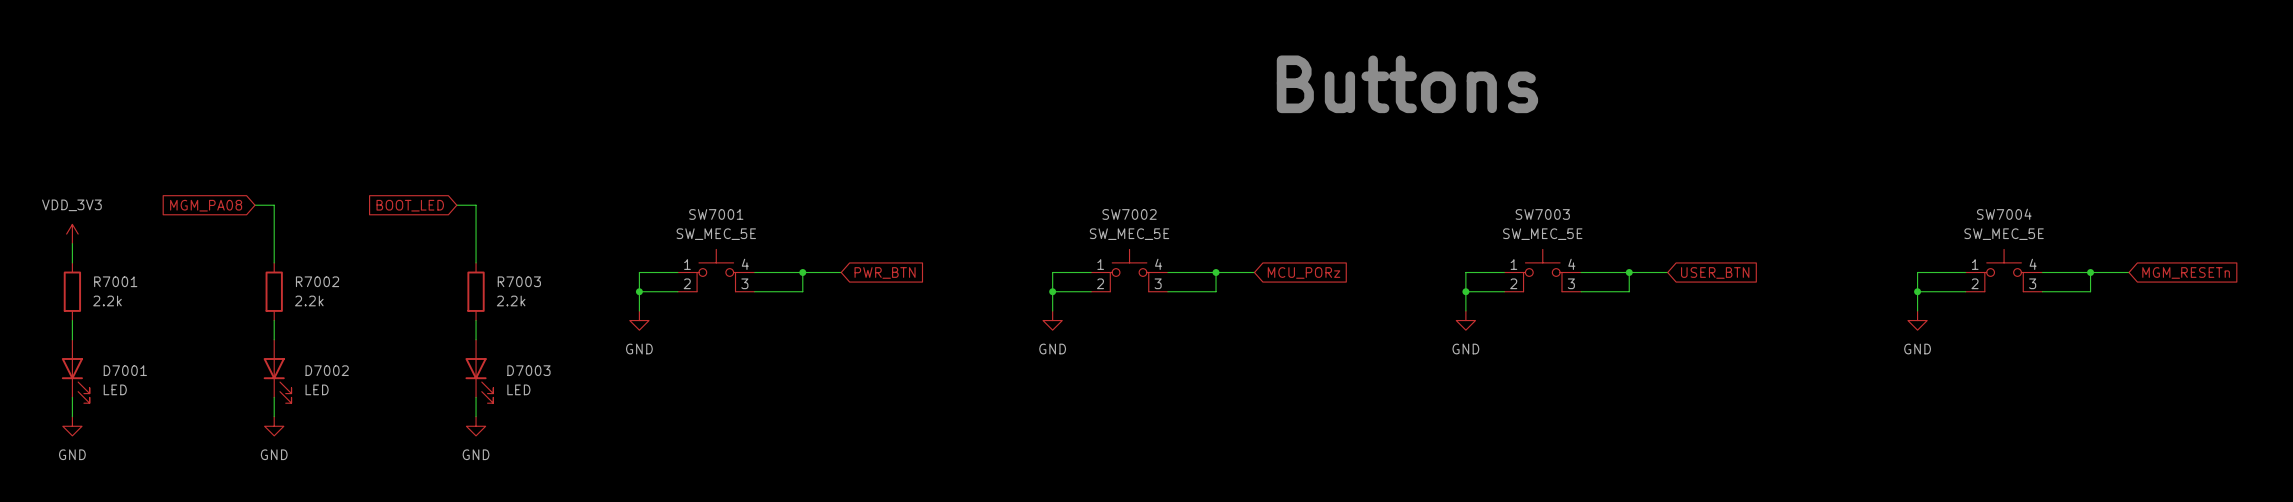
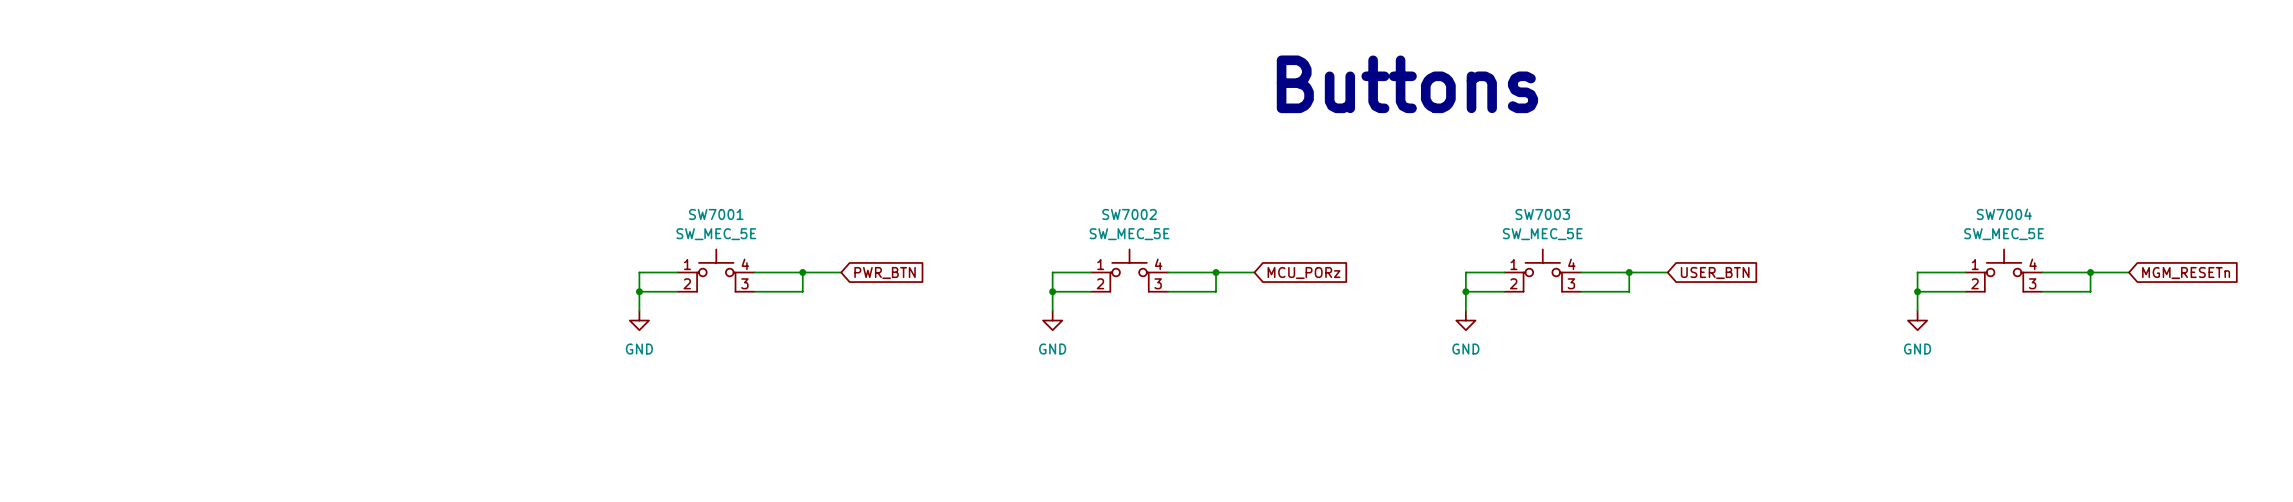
global label: MGM_PA08 (206, 205) -> none
wire: (255, 205) (274, 205) (274, 262) -> none
global label: BOOT_LED (410, 205) -> none
wire: (456, 205) (476, 205) (476, 262) -> none
power symbol: VDD_3V3 (72, 234) -> none
wire: (72, 243) (72, 262) -> none
R7001: 2.2k (72, 291) -> none
R7002: 2.2k (274, 291) -> none
R7003: 2.2k (476, 291) -> none
wire: (72, 320) (72, 339) -> none
wire: (274, 320) (274, 339) -> none
wire: (476, 320) (476, 339) -> none
D7001: LED (75, 371) -> none
D7002: LED (277, 371) -> none
D7003: LED (479, 371) -> none
wire: (72, 397) (72, 416) -> none
wire: (274, 397) (274, 416) -> none
wire: (476, 397) (476, 416) -> none
power symbol: GND (72, 426) -> none
power symbol: GND (274, 426) -> none
power symbol: GND (476, 426) -> none

